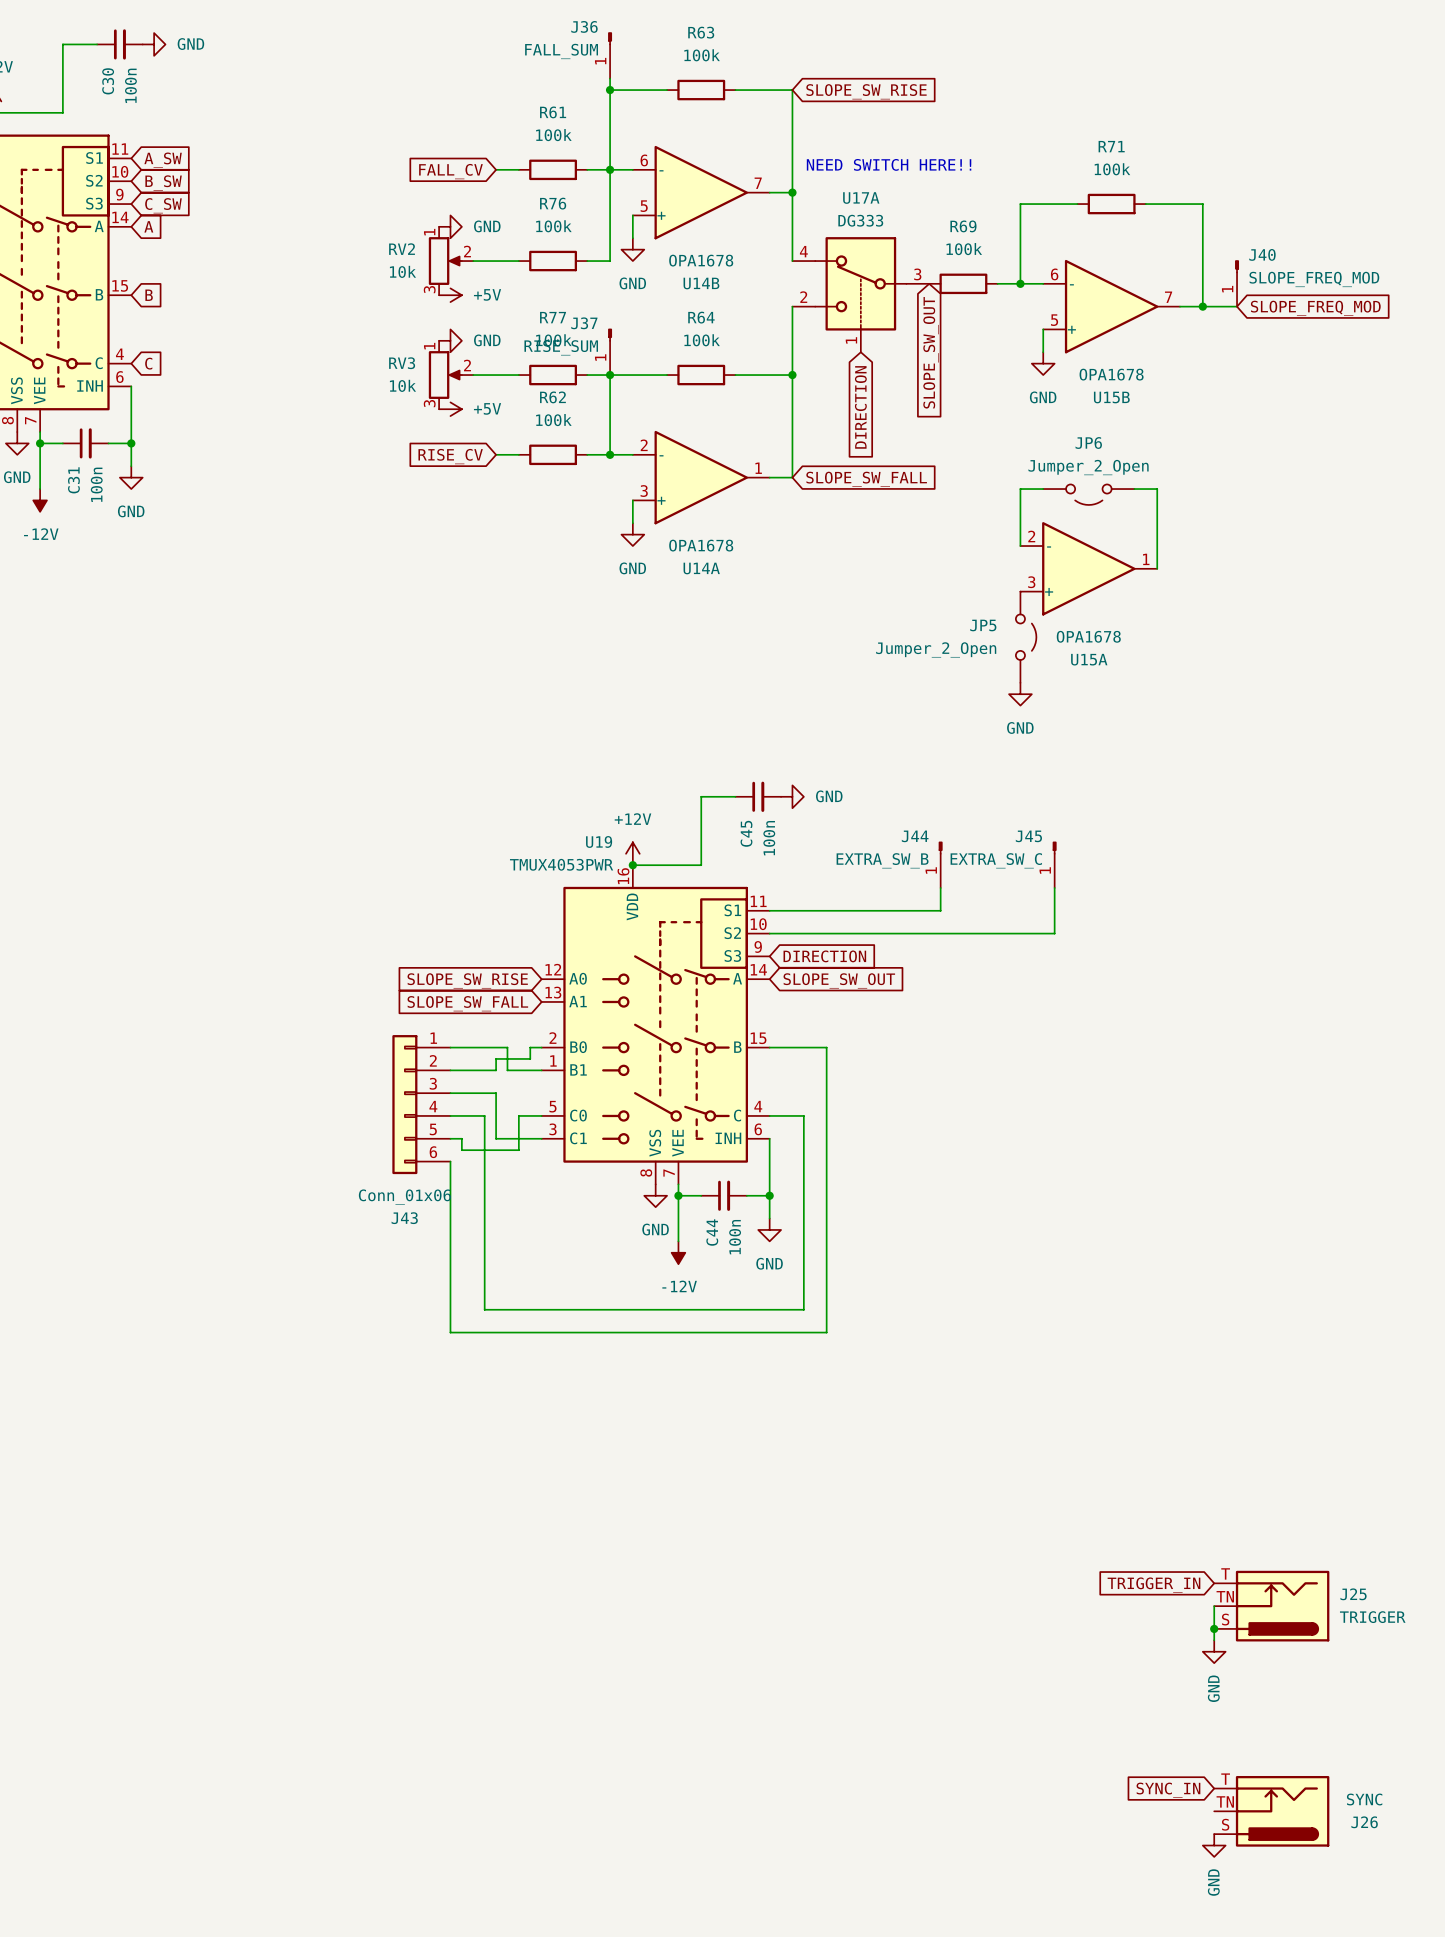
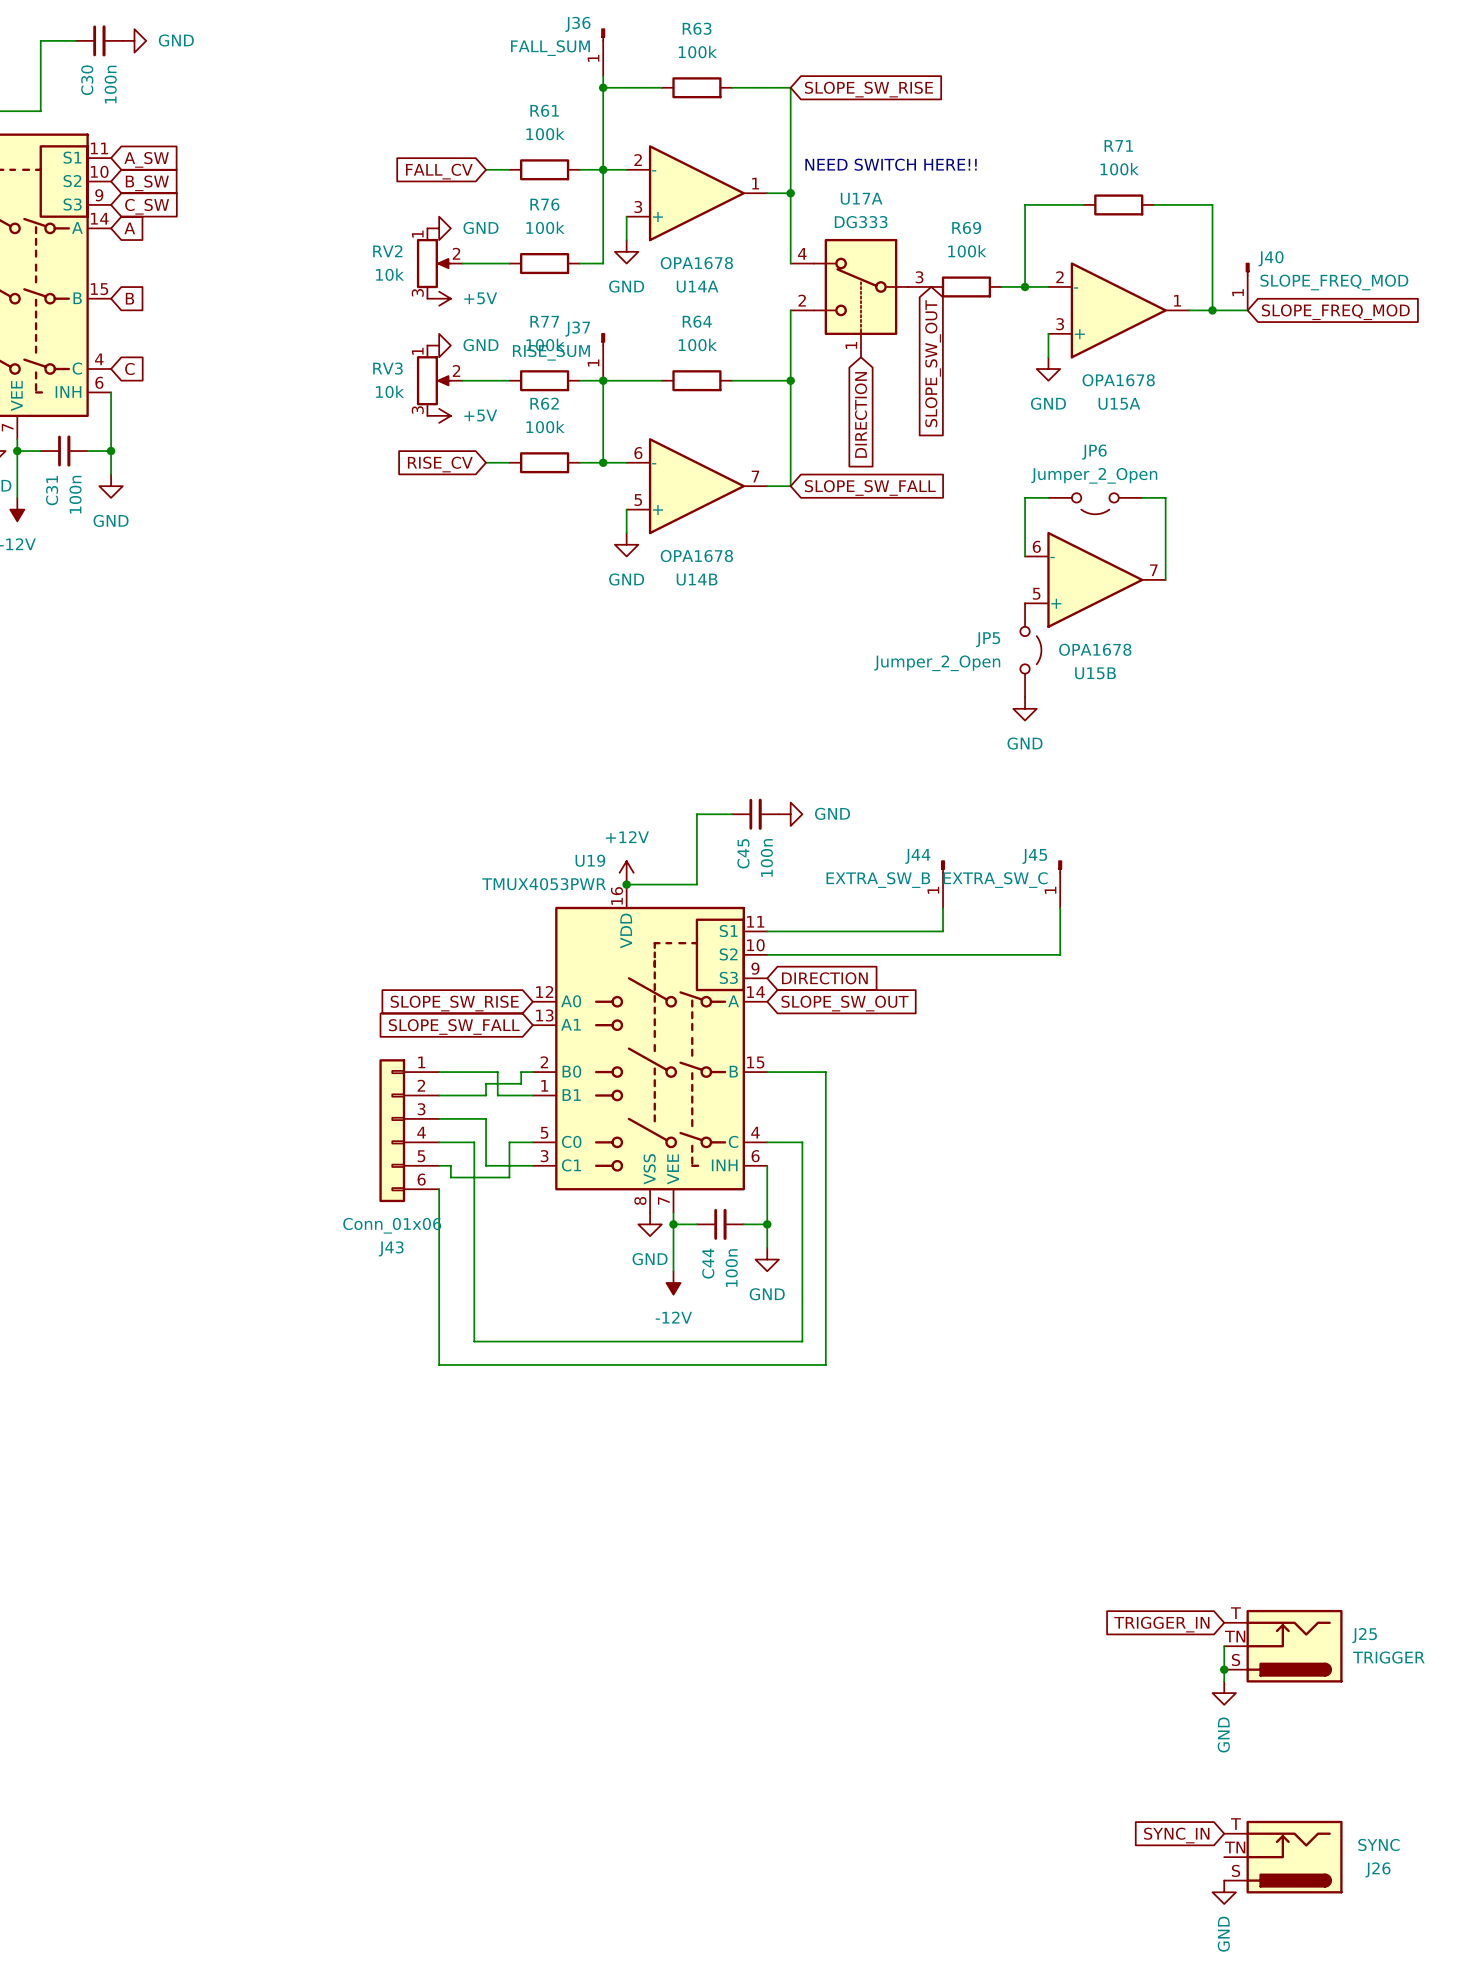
U14B position: (701, 192) -> (696, 486)
U15B position: (1111, 306) -> (1095, 579)
U14A position: (701, 477) -> (696, 193)
U15A position: (1088, 568) -> (1118, 310)

